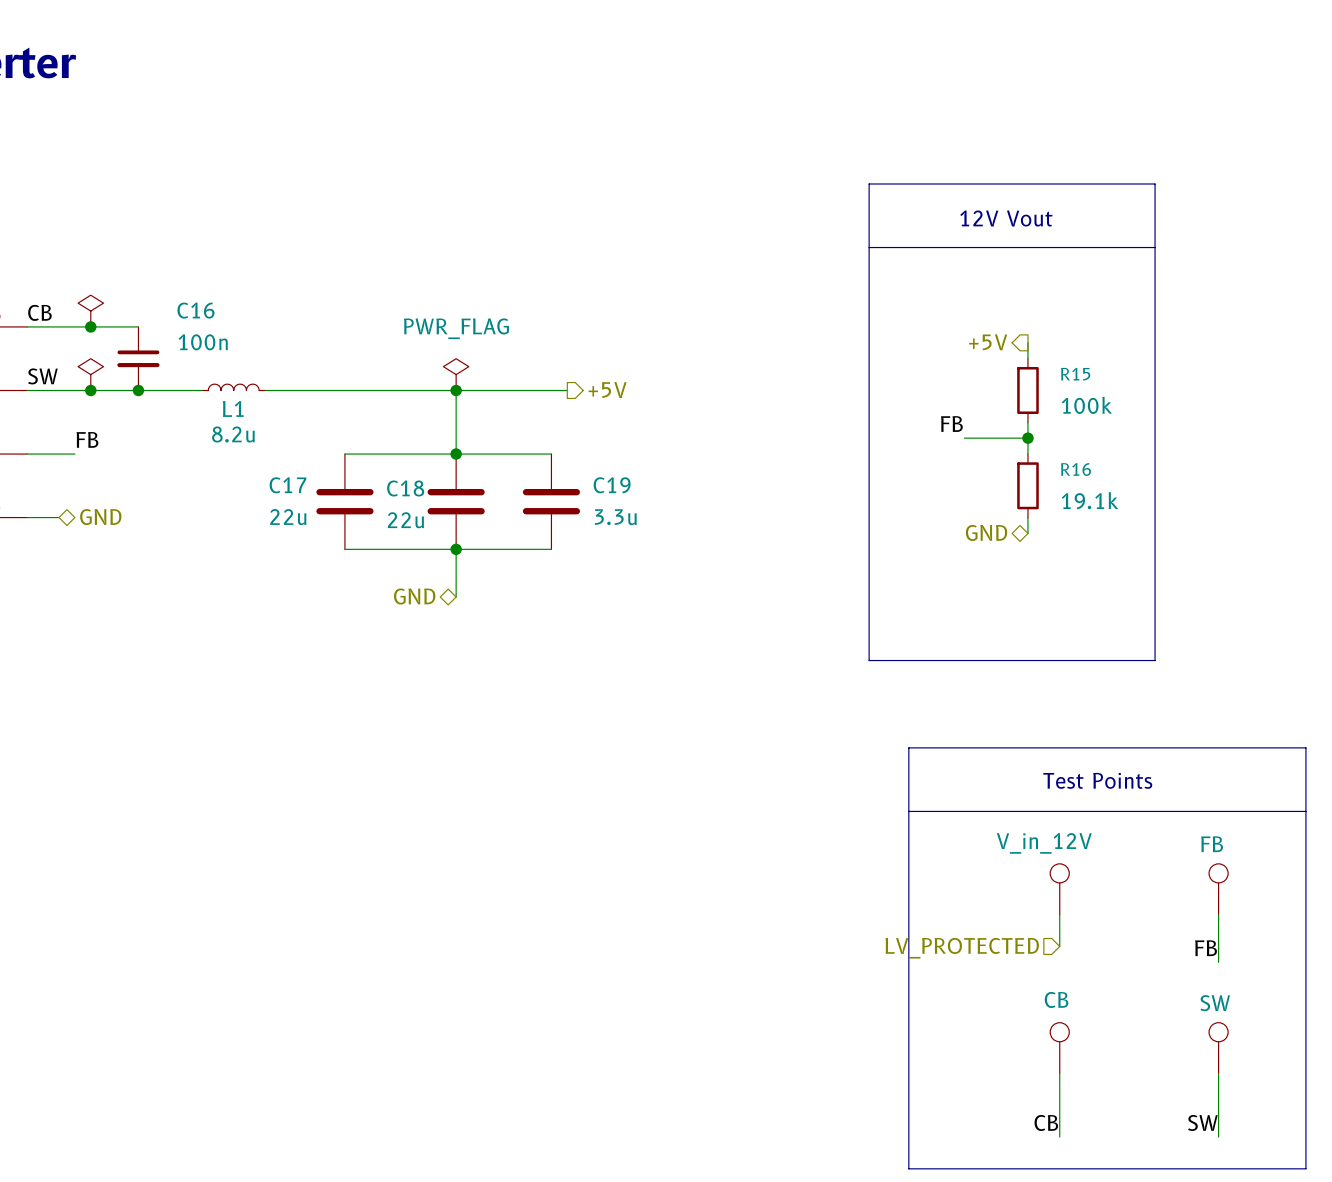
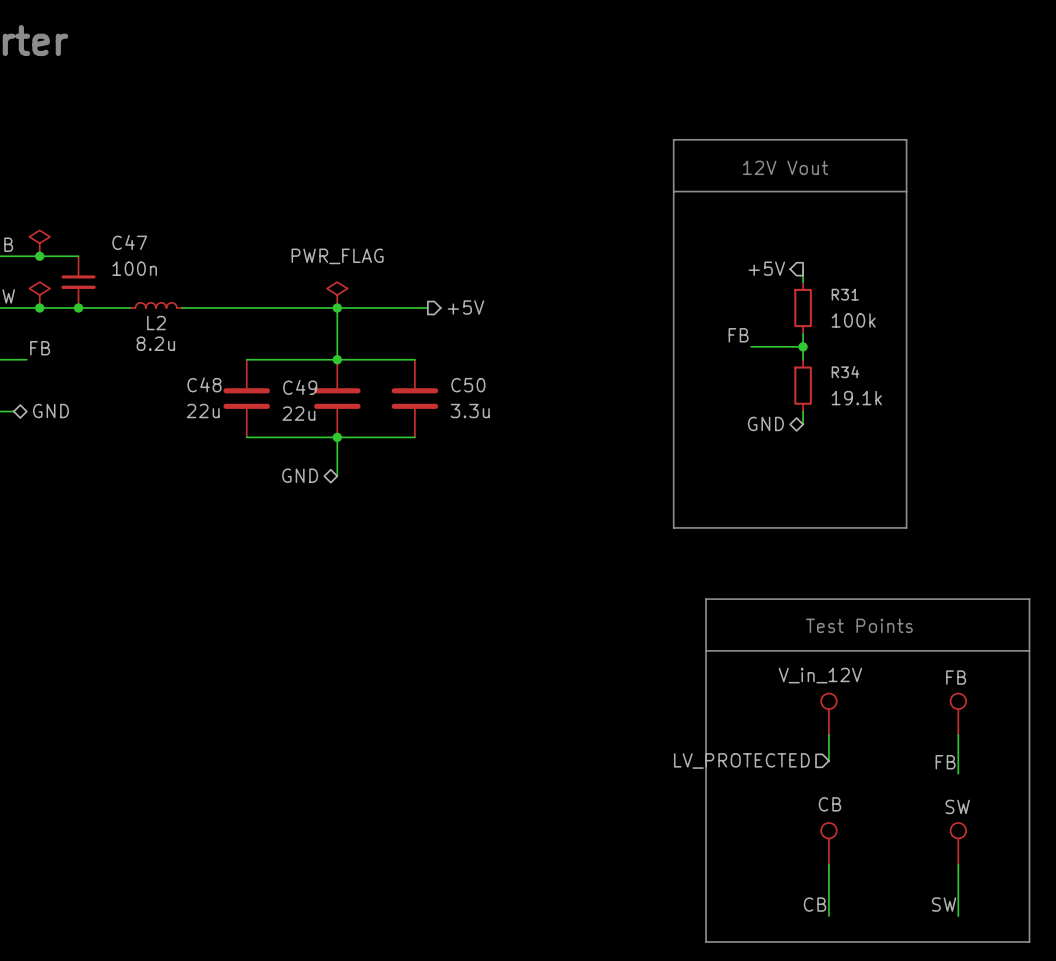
C16 name: C16 (195, 310) -> C47 (129, 242)
R15 name: R15 (1075, 374) -> R31 (845, 294)
L1 name: L1 (233, 408) -> L2 (156, 323)
R16 name: R16 (1075, 469) -> R34 (845, 372)
C17 name: C17 (287, 485) -> C48 (204, 384)
C19 name: C19 (612, 485) -> C50 (468, 385)
C18 name: C18 (405, 488) -> C49 (300, 387)

